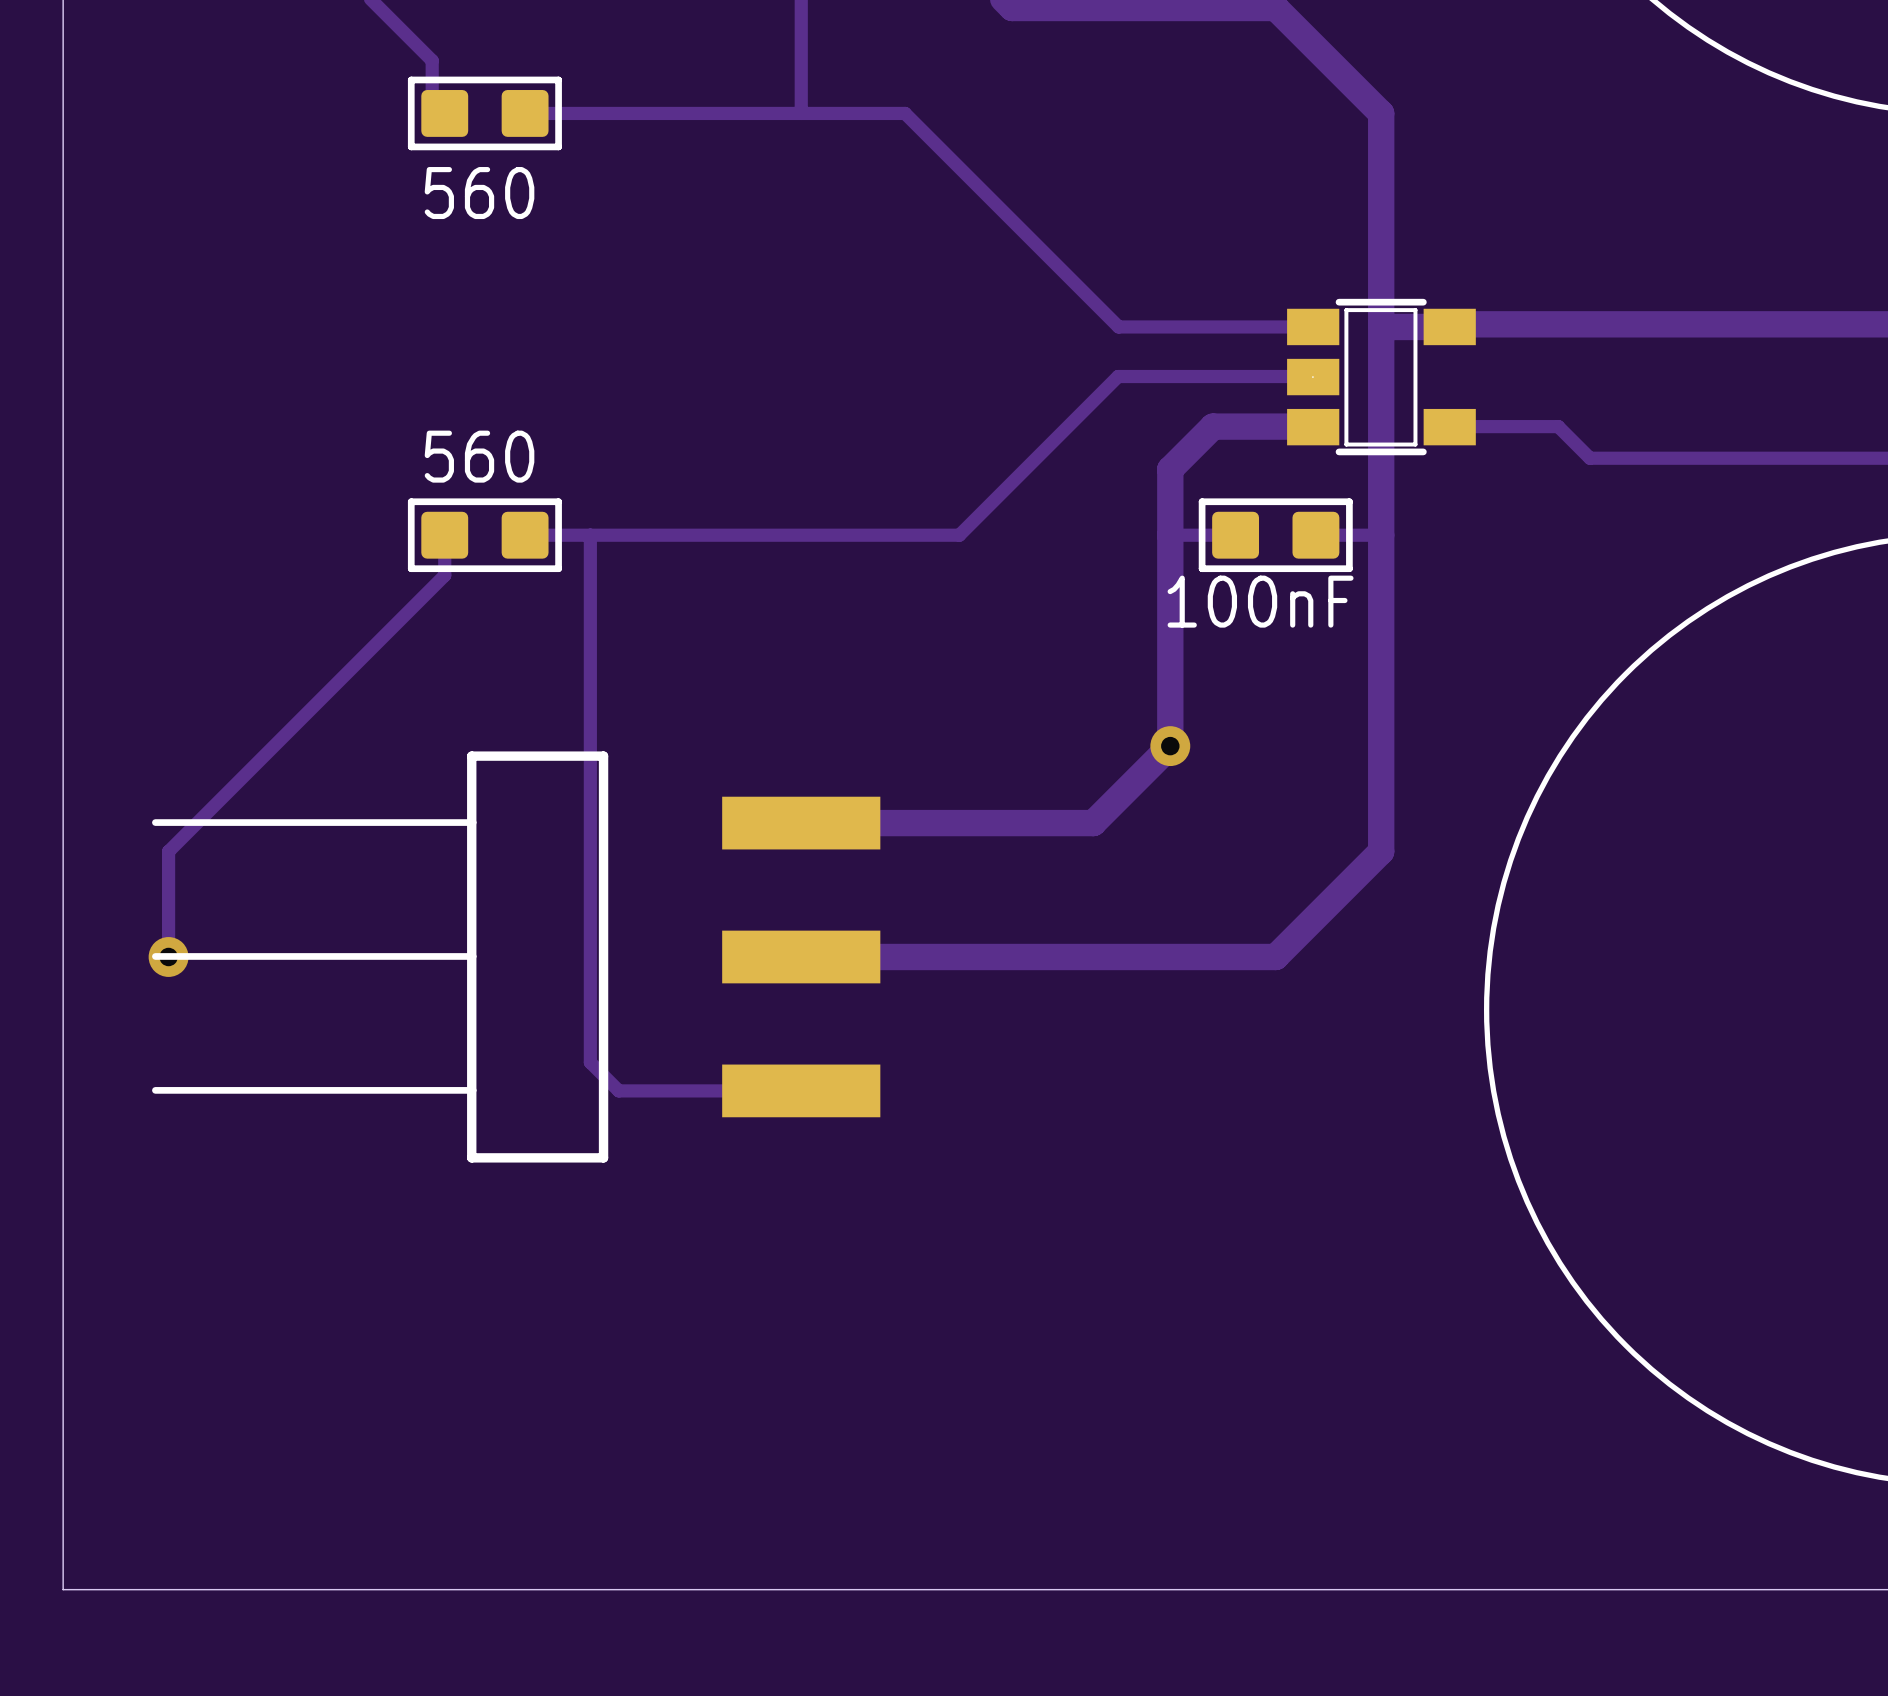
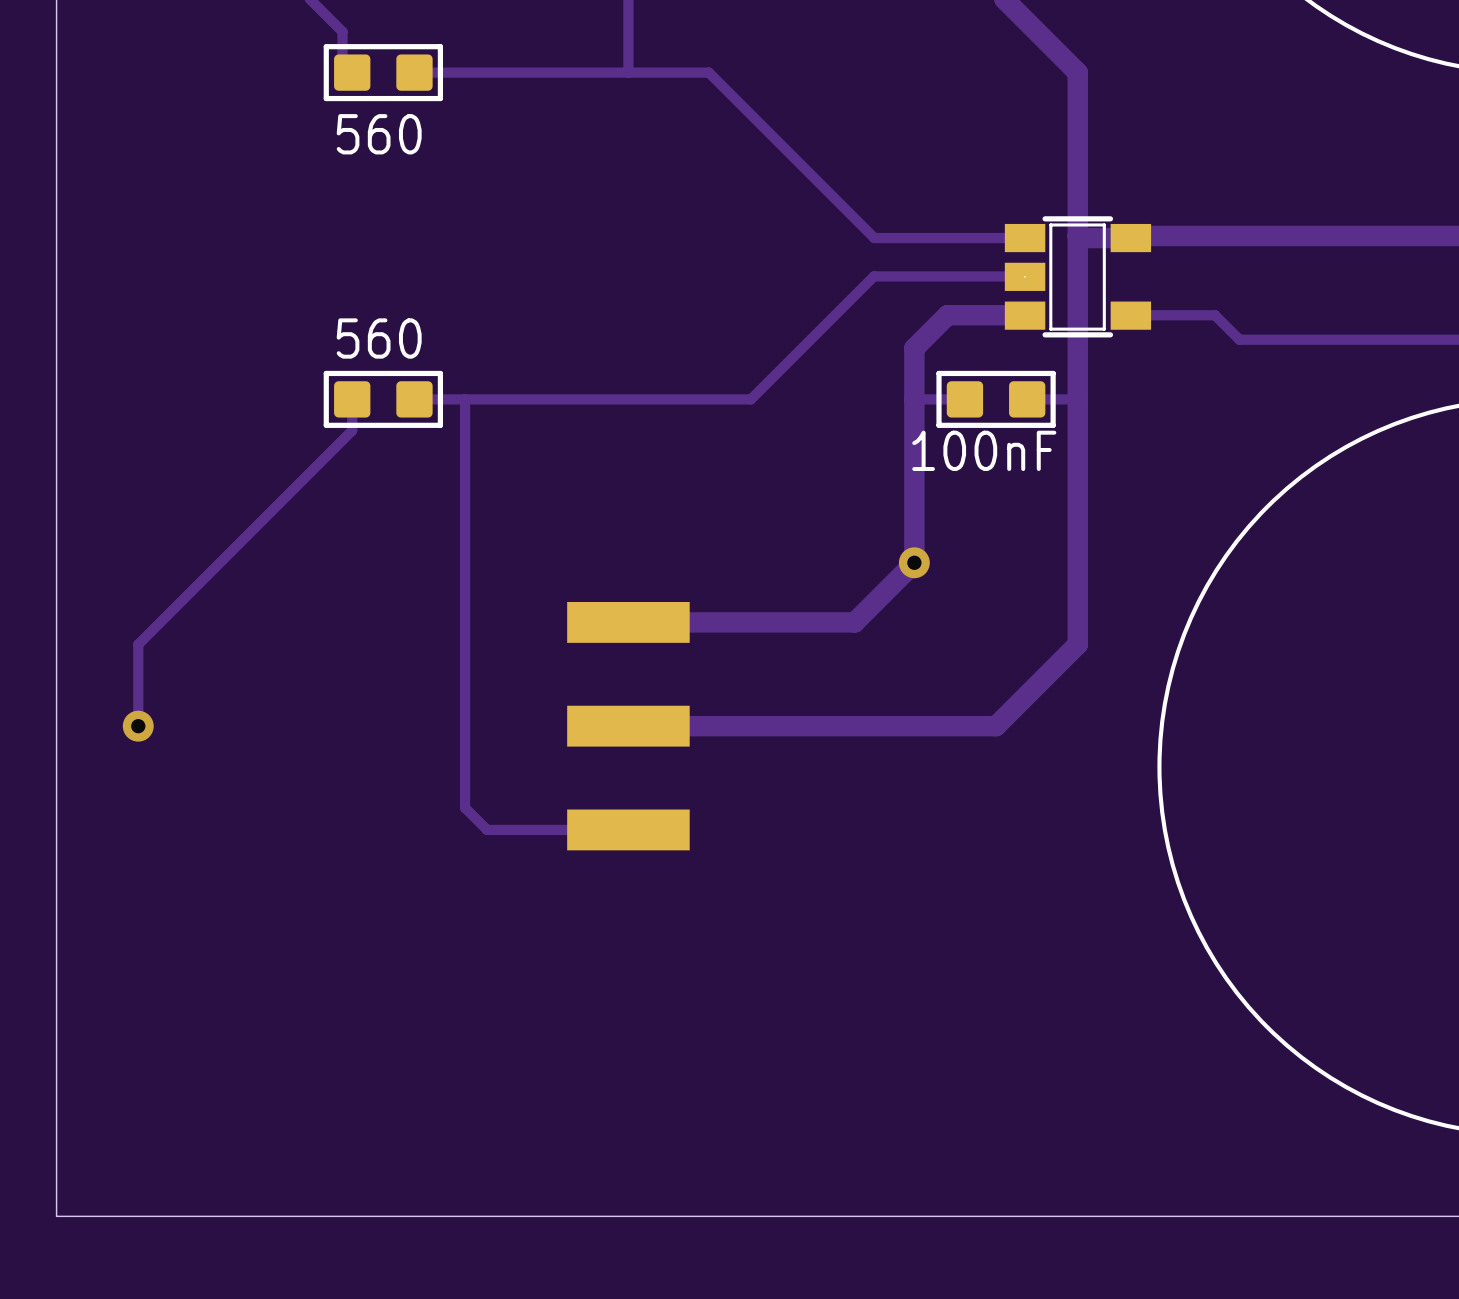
part: (516, 956) -> none

